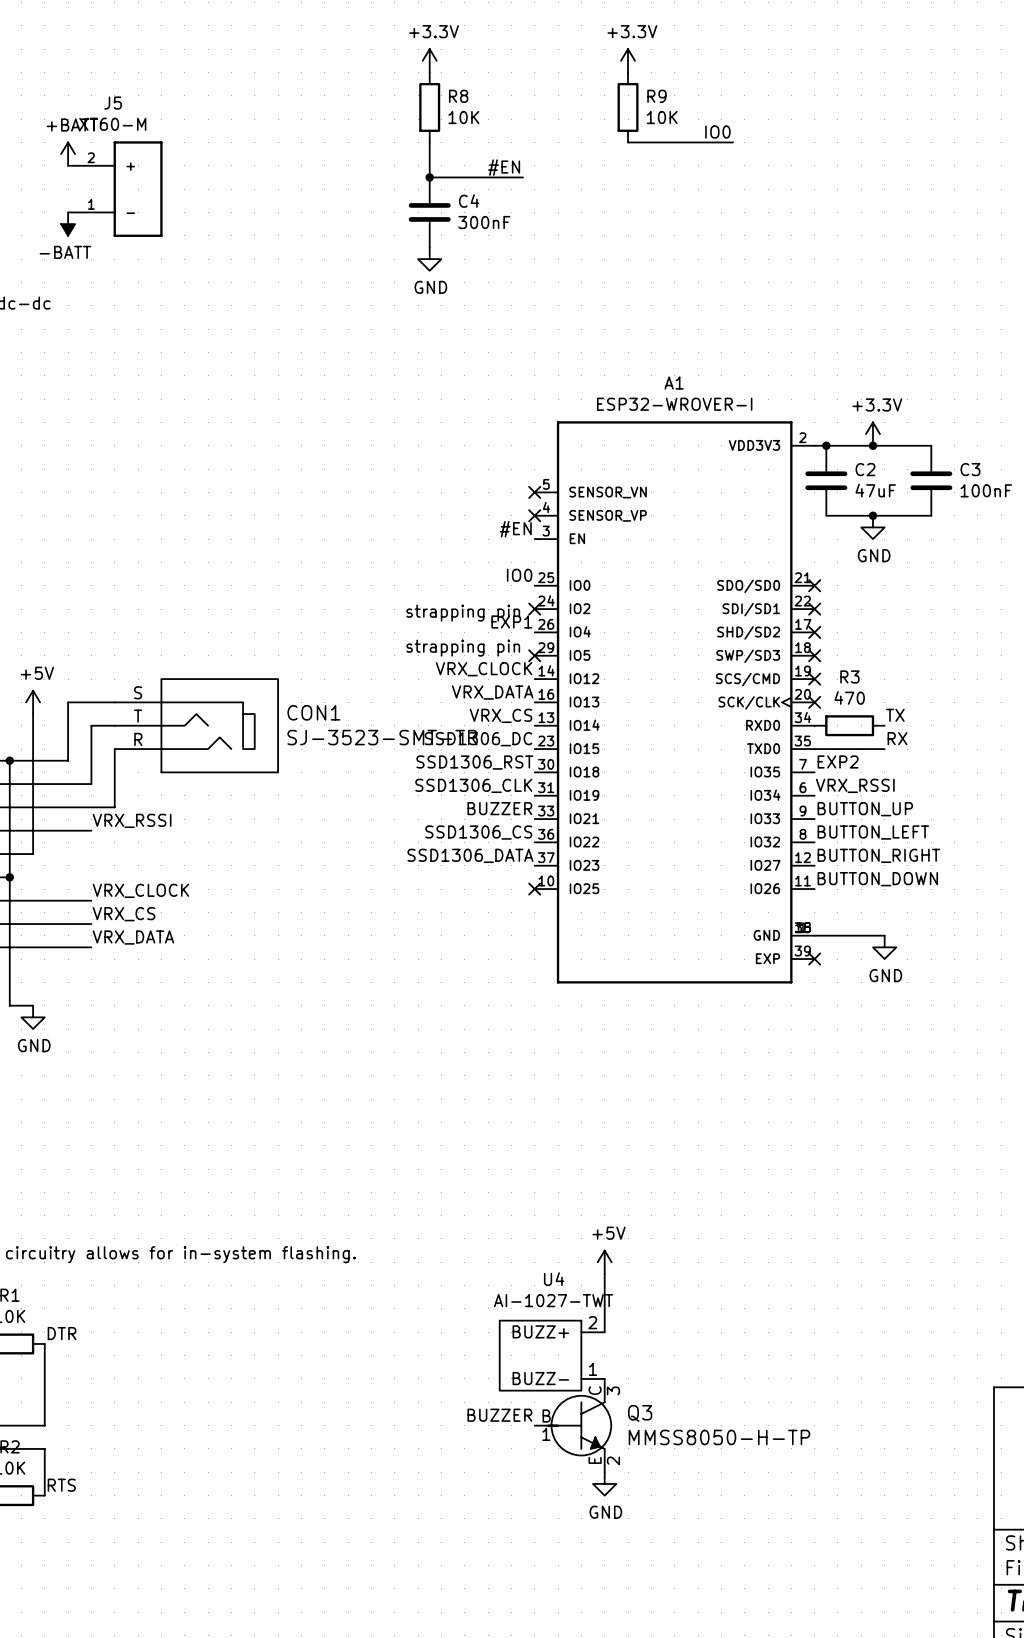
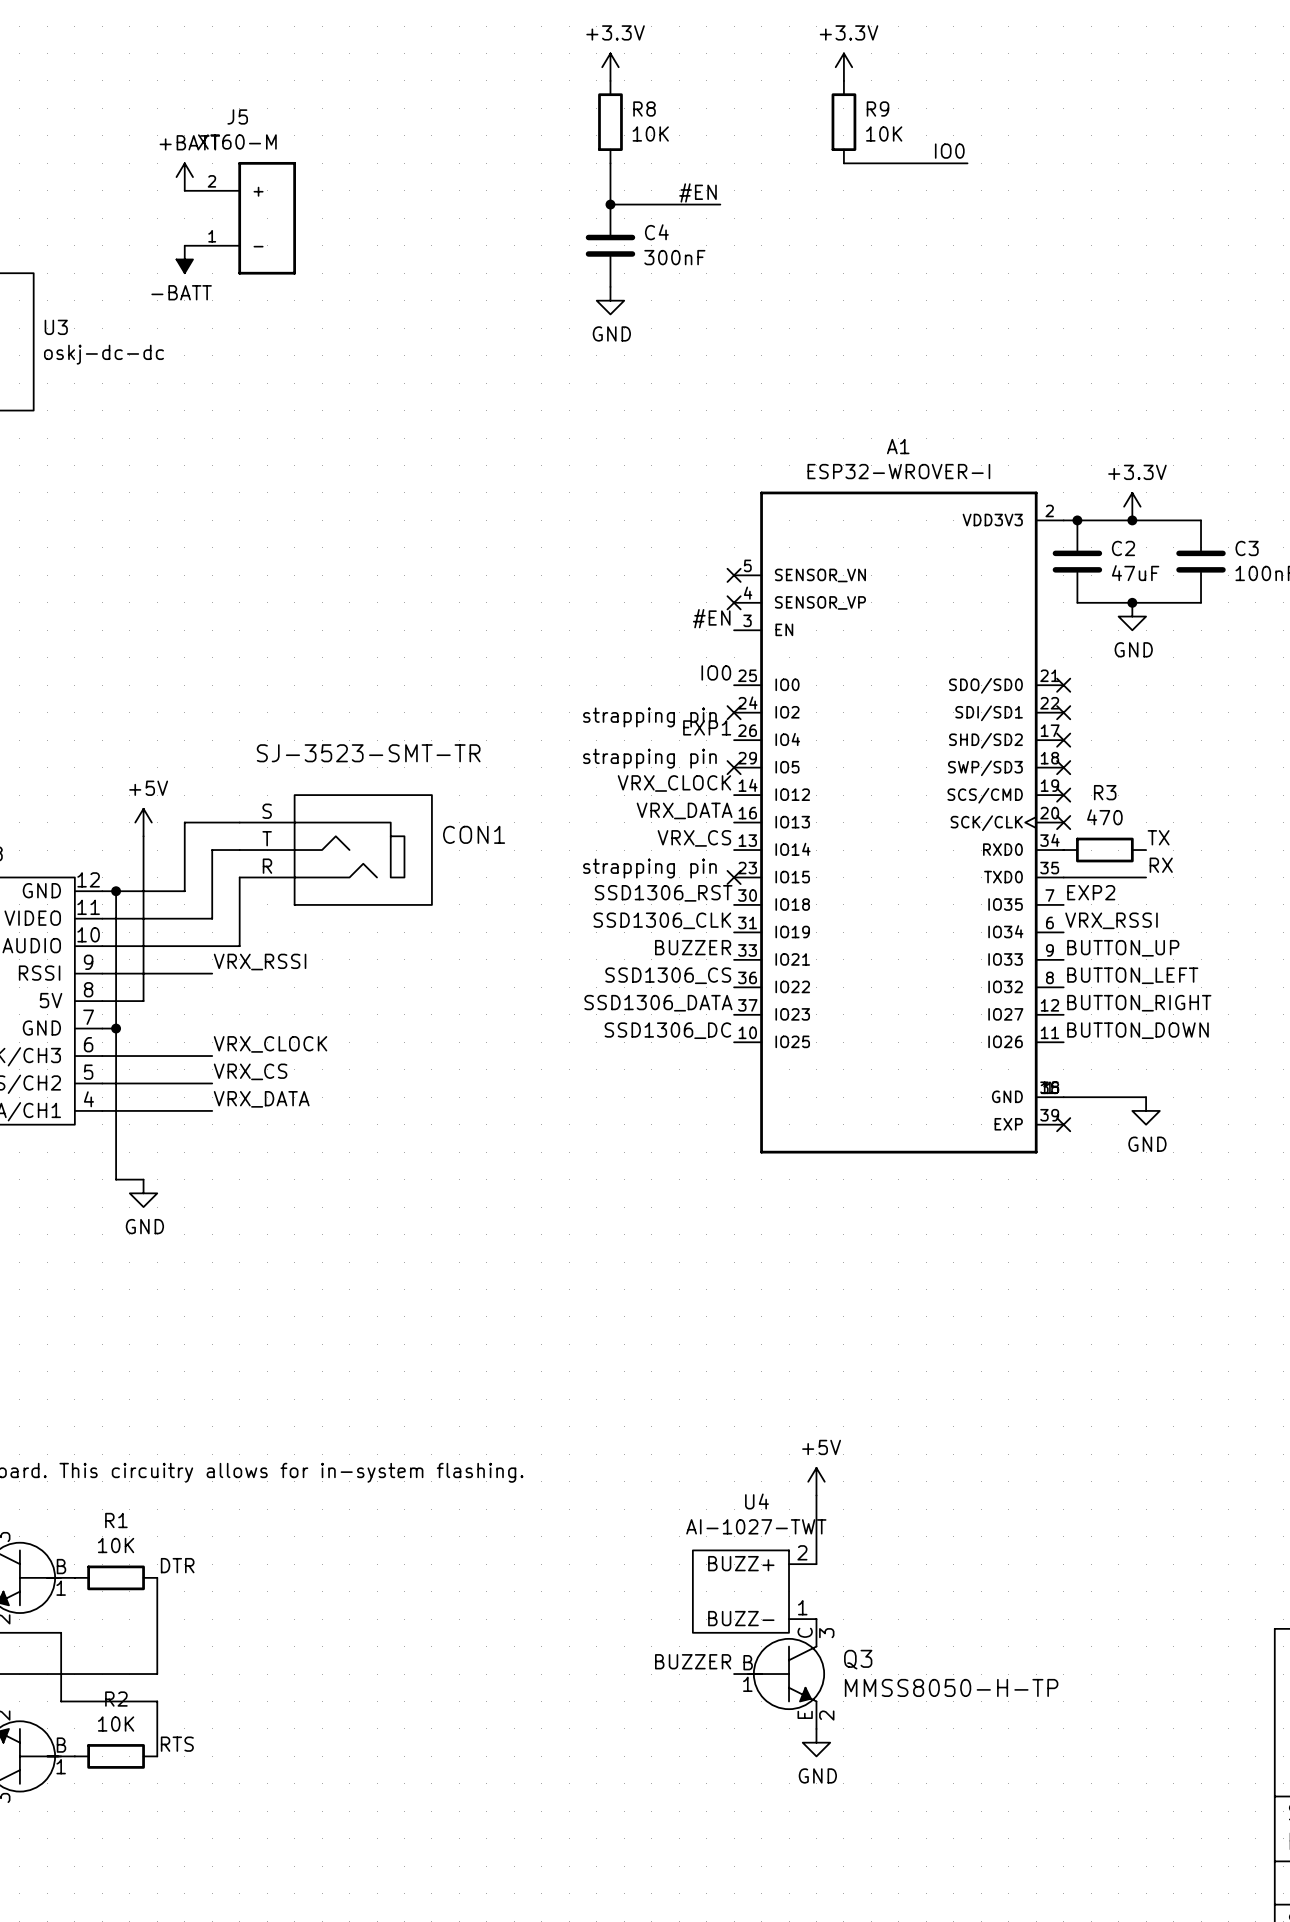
CON1 value position: SJ-3523-SMT-TR (382, 737) -> SJ-3523-SMT-TR (368, 753)
label position: SSD1306_DC (478, 739) -> SSD1306_DC (667, 1030)
text: none -> strapping pin (649, 868)
no-connect mark: none -> (734, 877)
no-connect mark: (534, 889) -> none

